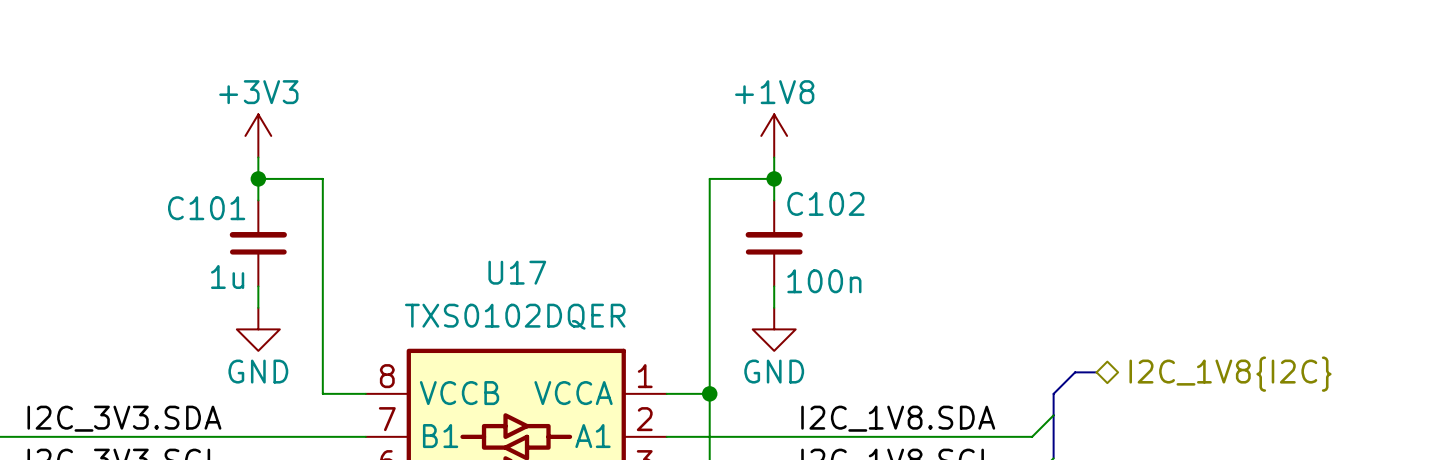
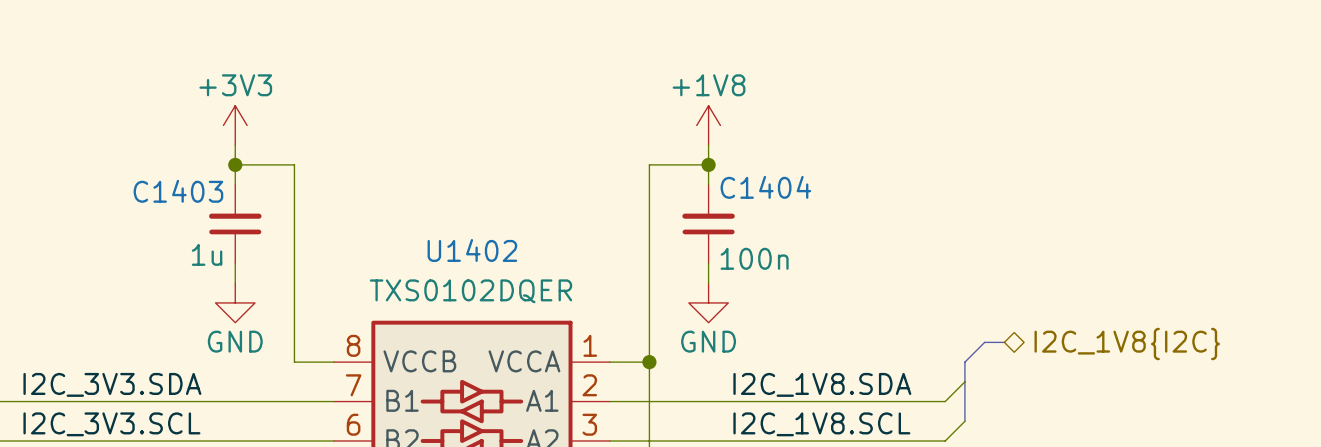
C102 name: C102 (825, 203) -> C1404 (765, 187)
C101 name: C101 (206, 208) -> C1403 (178, 191)
U17 name: U17 (517, 272) -> U1402 (472, 250)

